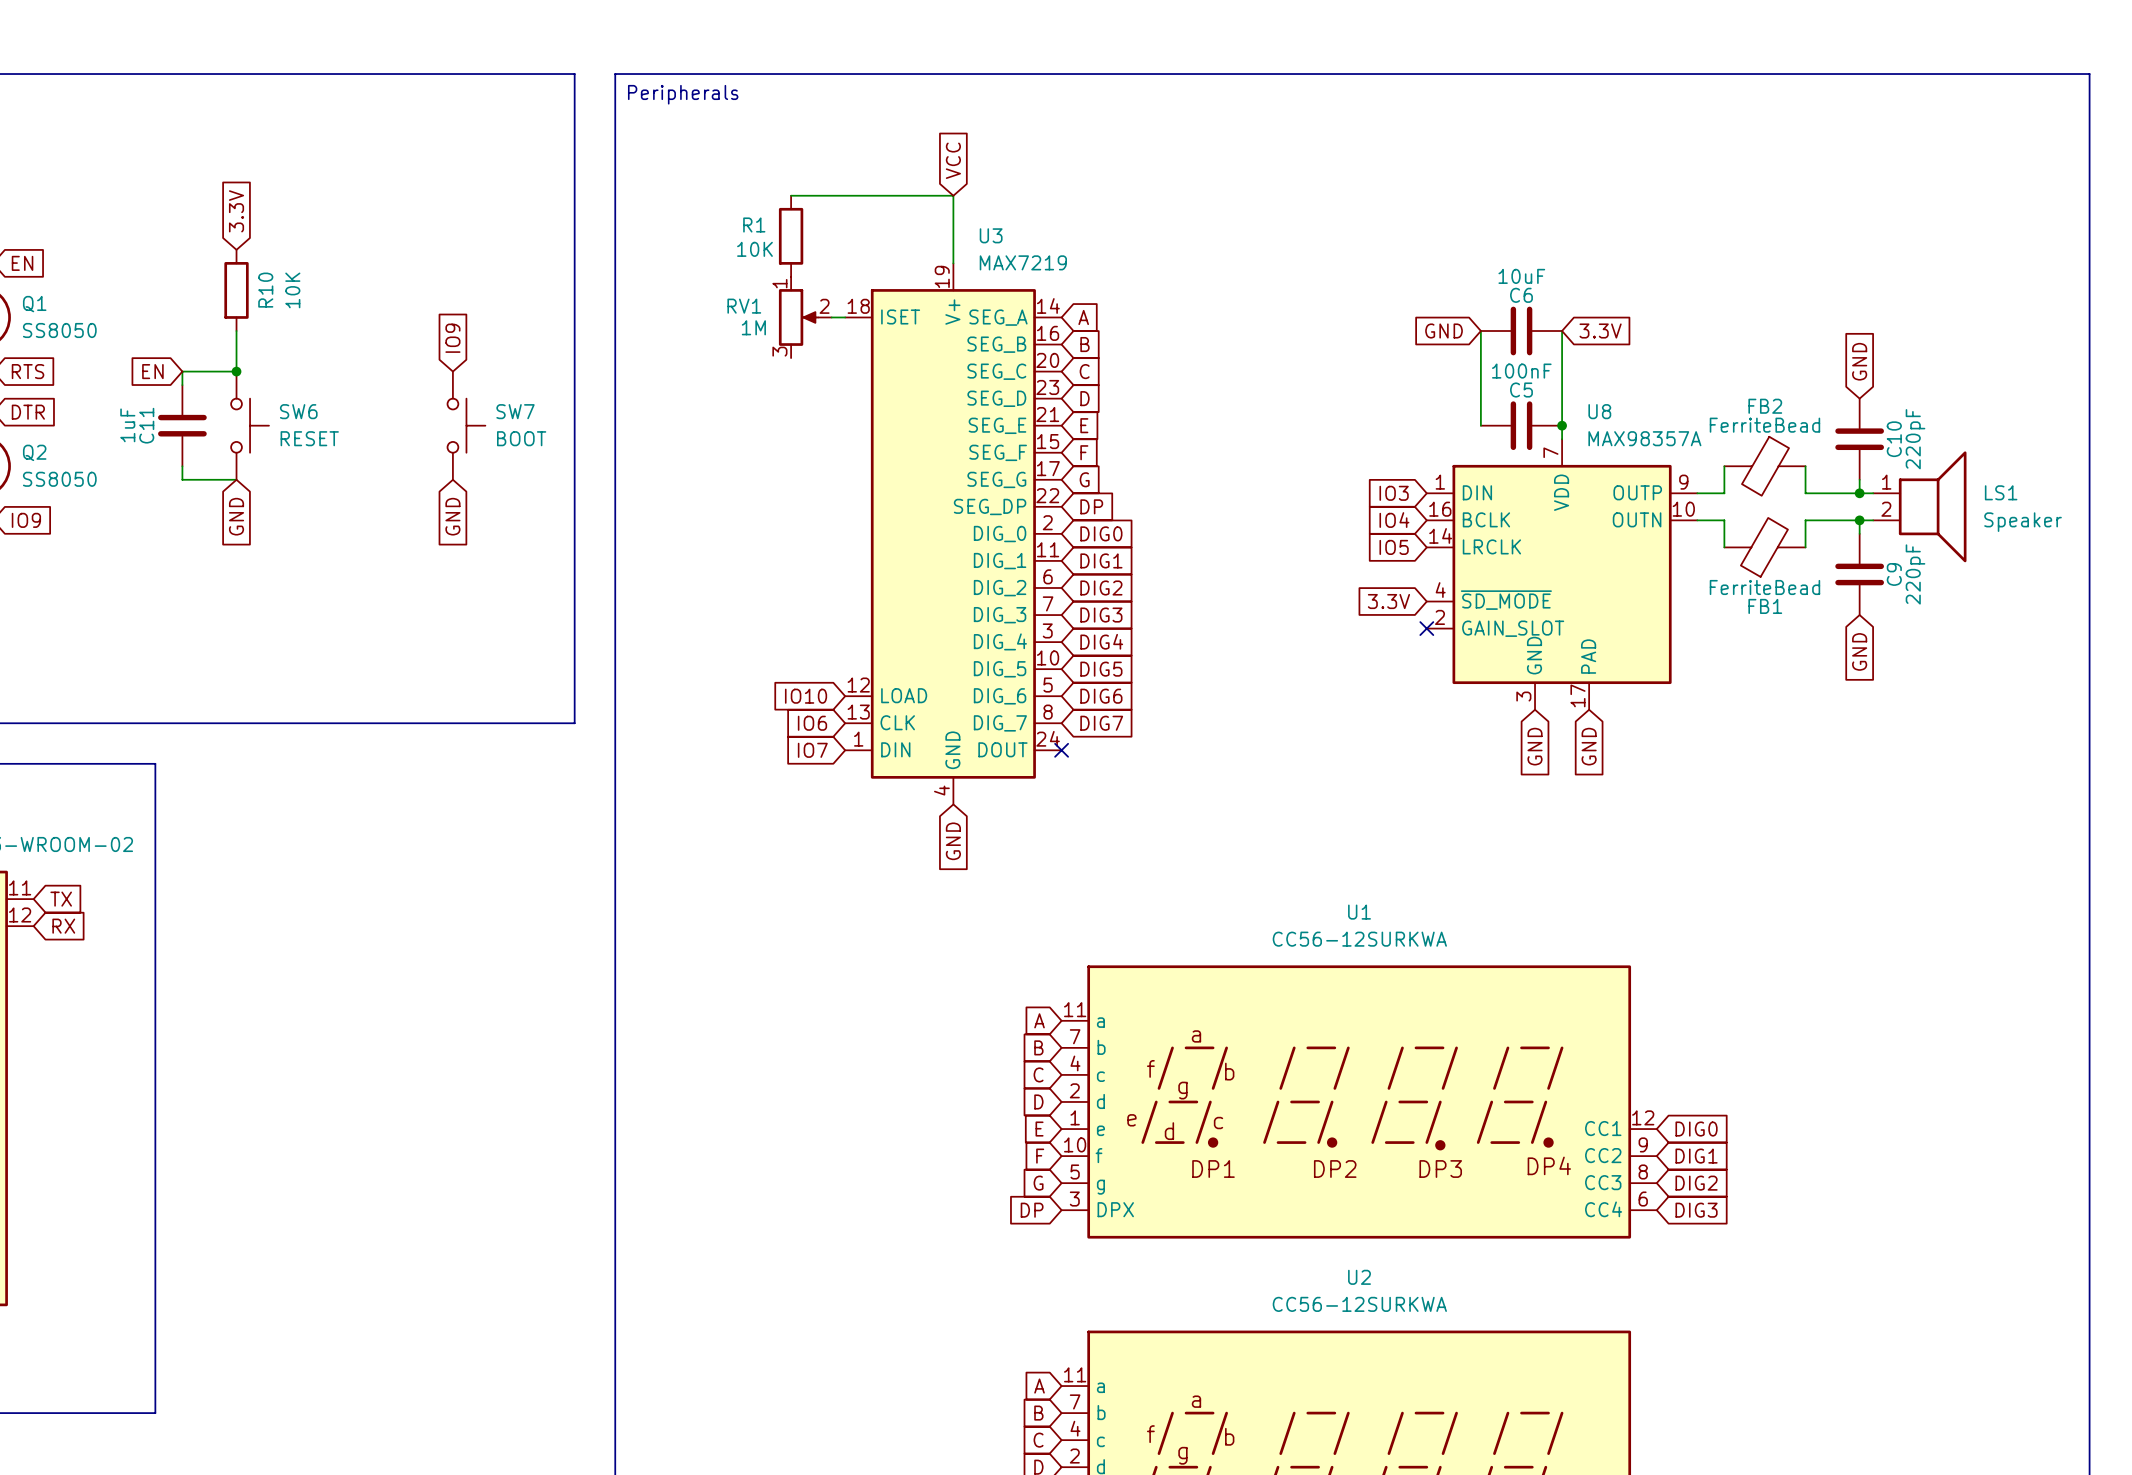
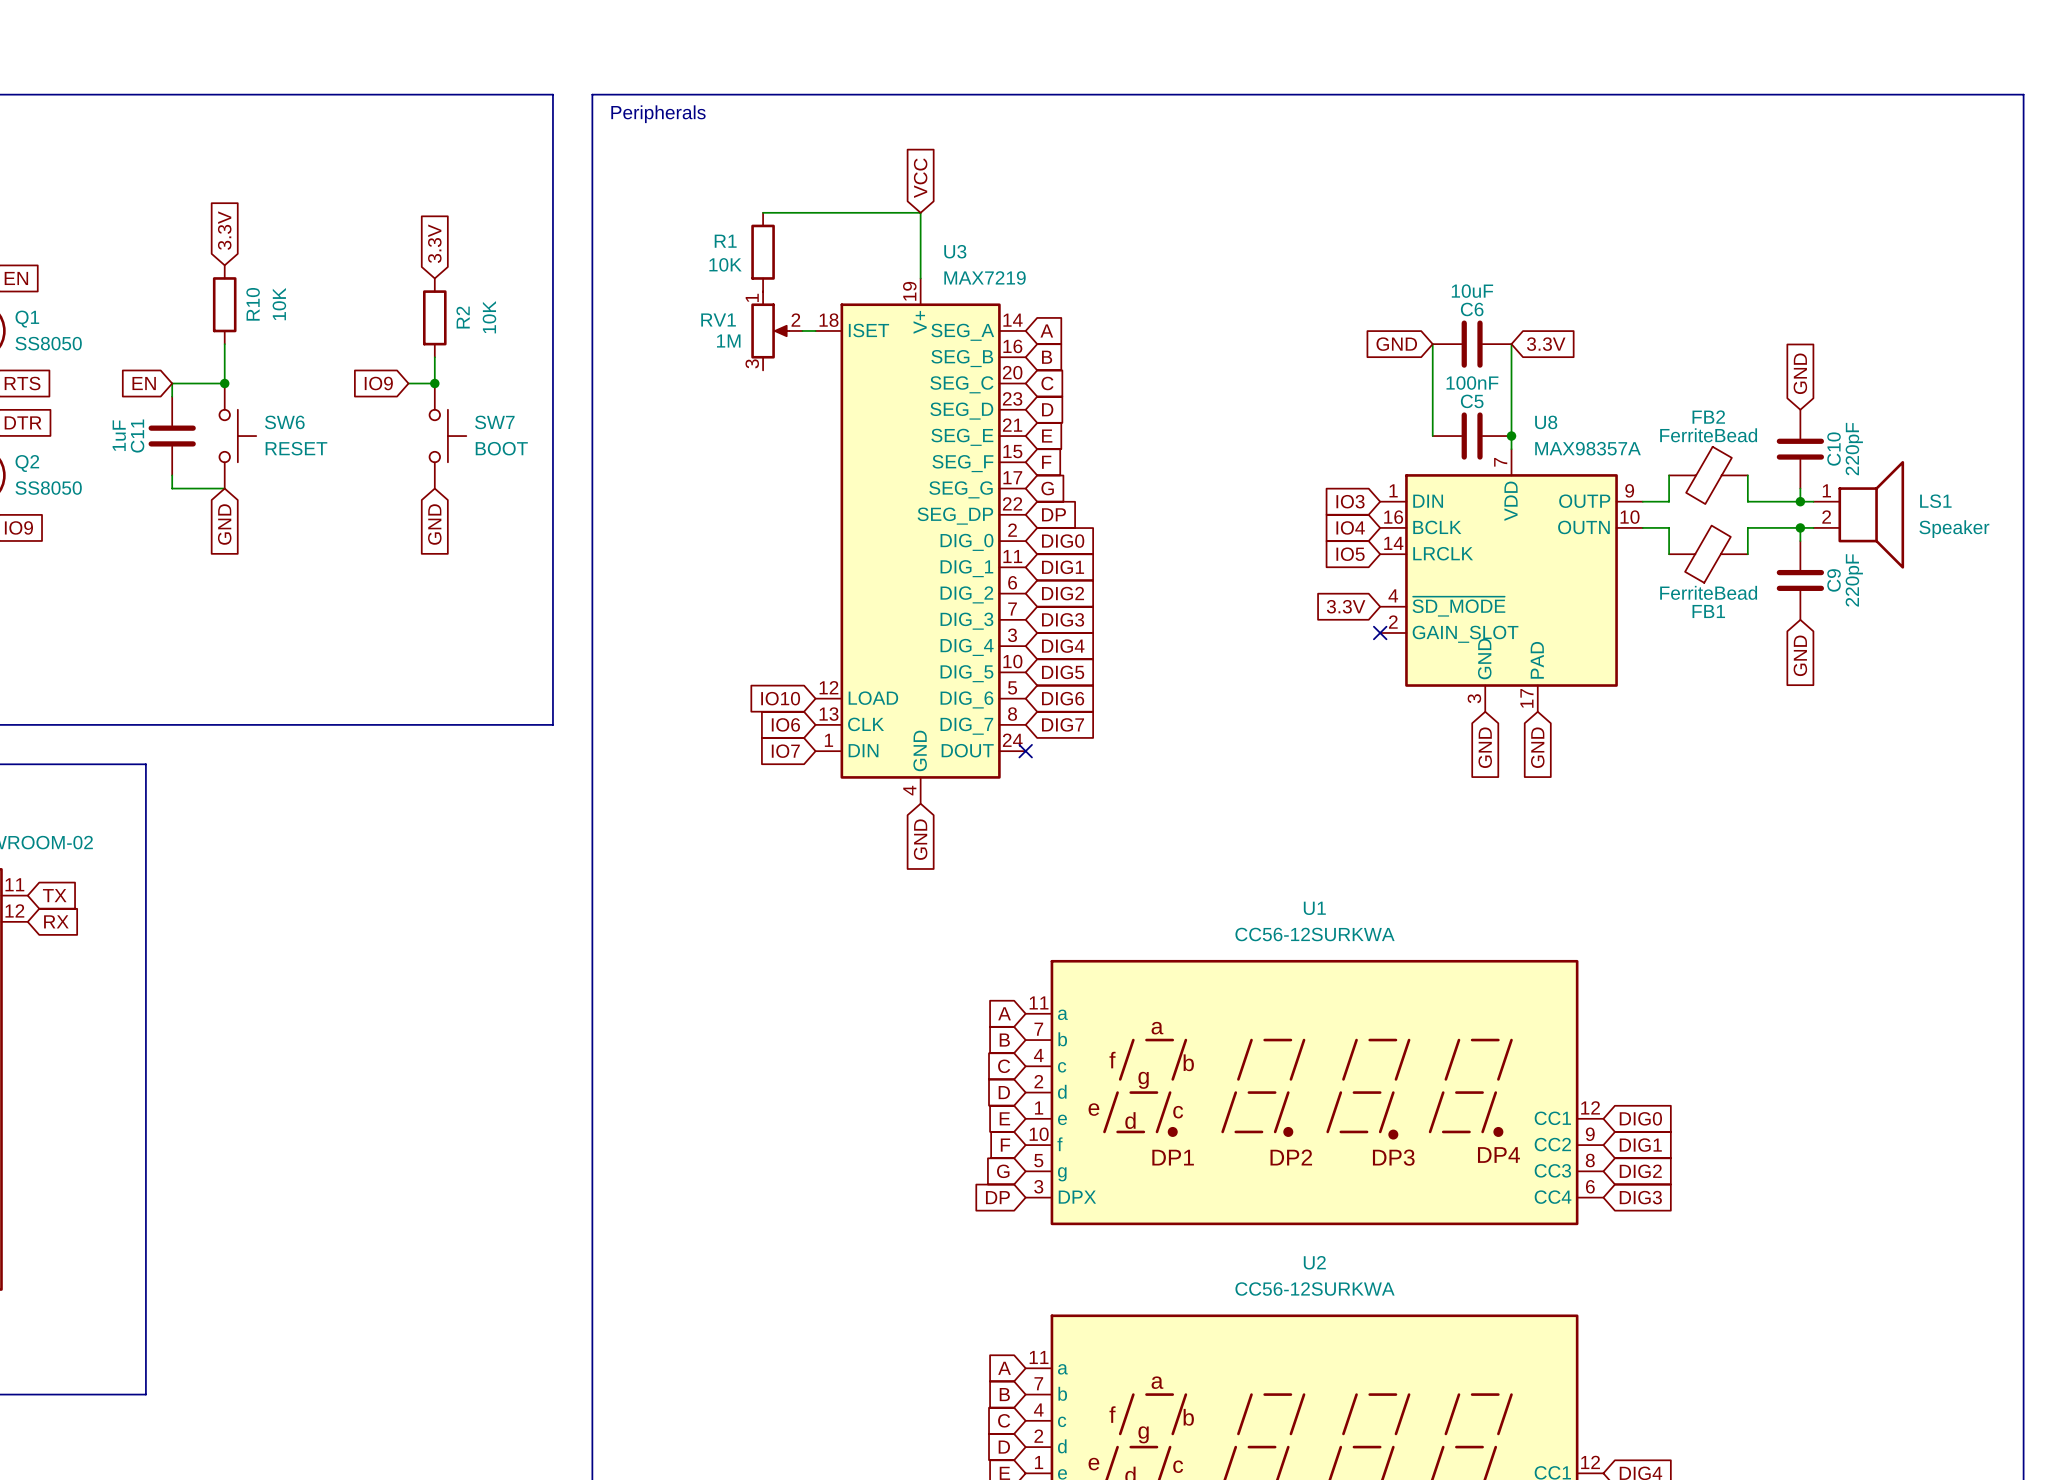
global label: none -> 3.3V (434, 243)
R2: none -> 10K (434, 317)
global label rotation: 0° (452, 338) -> 90° counterclockwise (378, 383)
wire: none -> (434, 357) (434, 383) (408, 383)
junction: none -> (434, 383)

